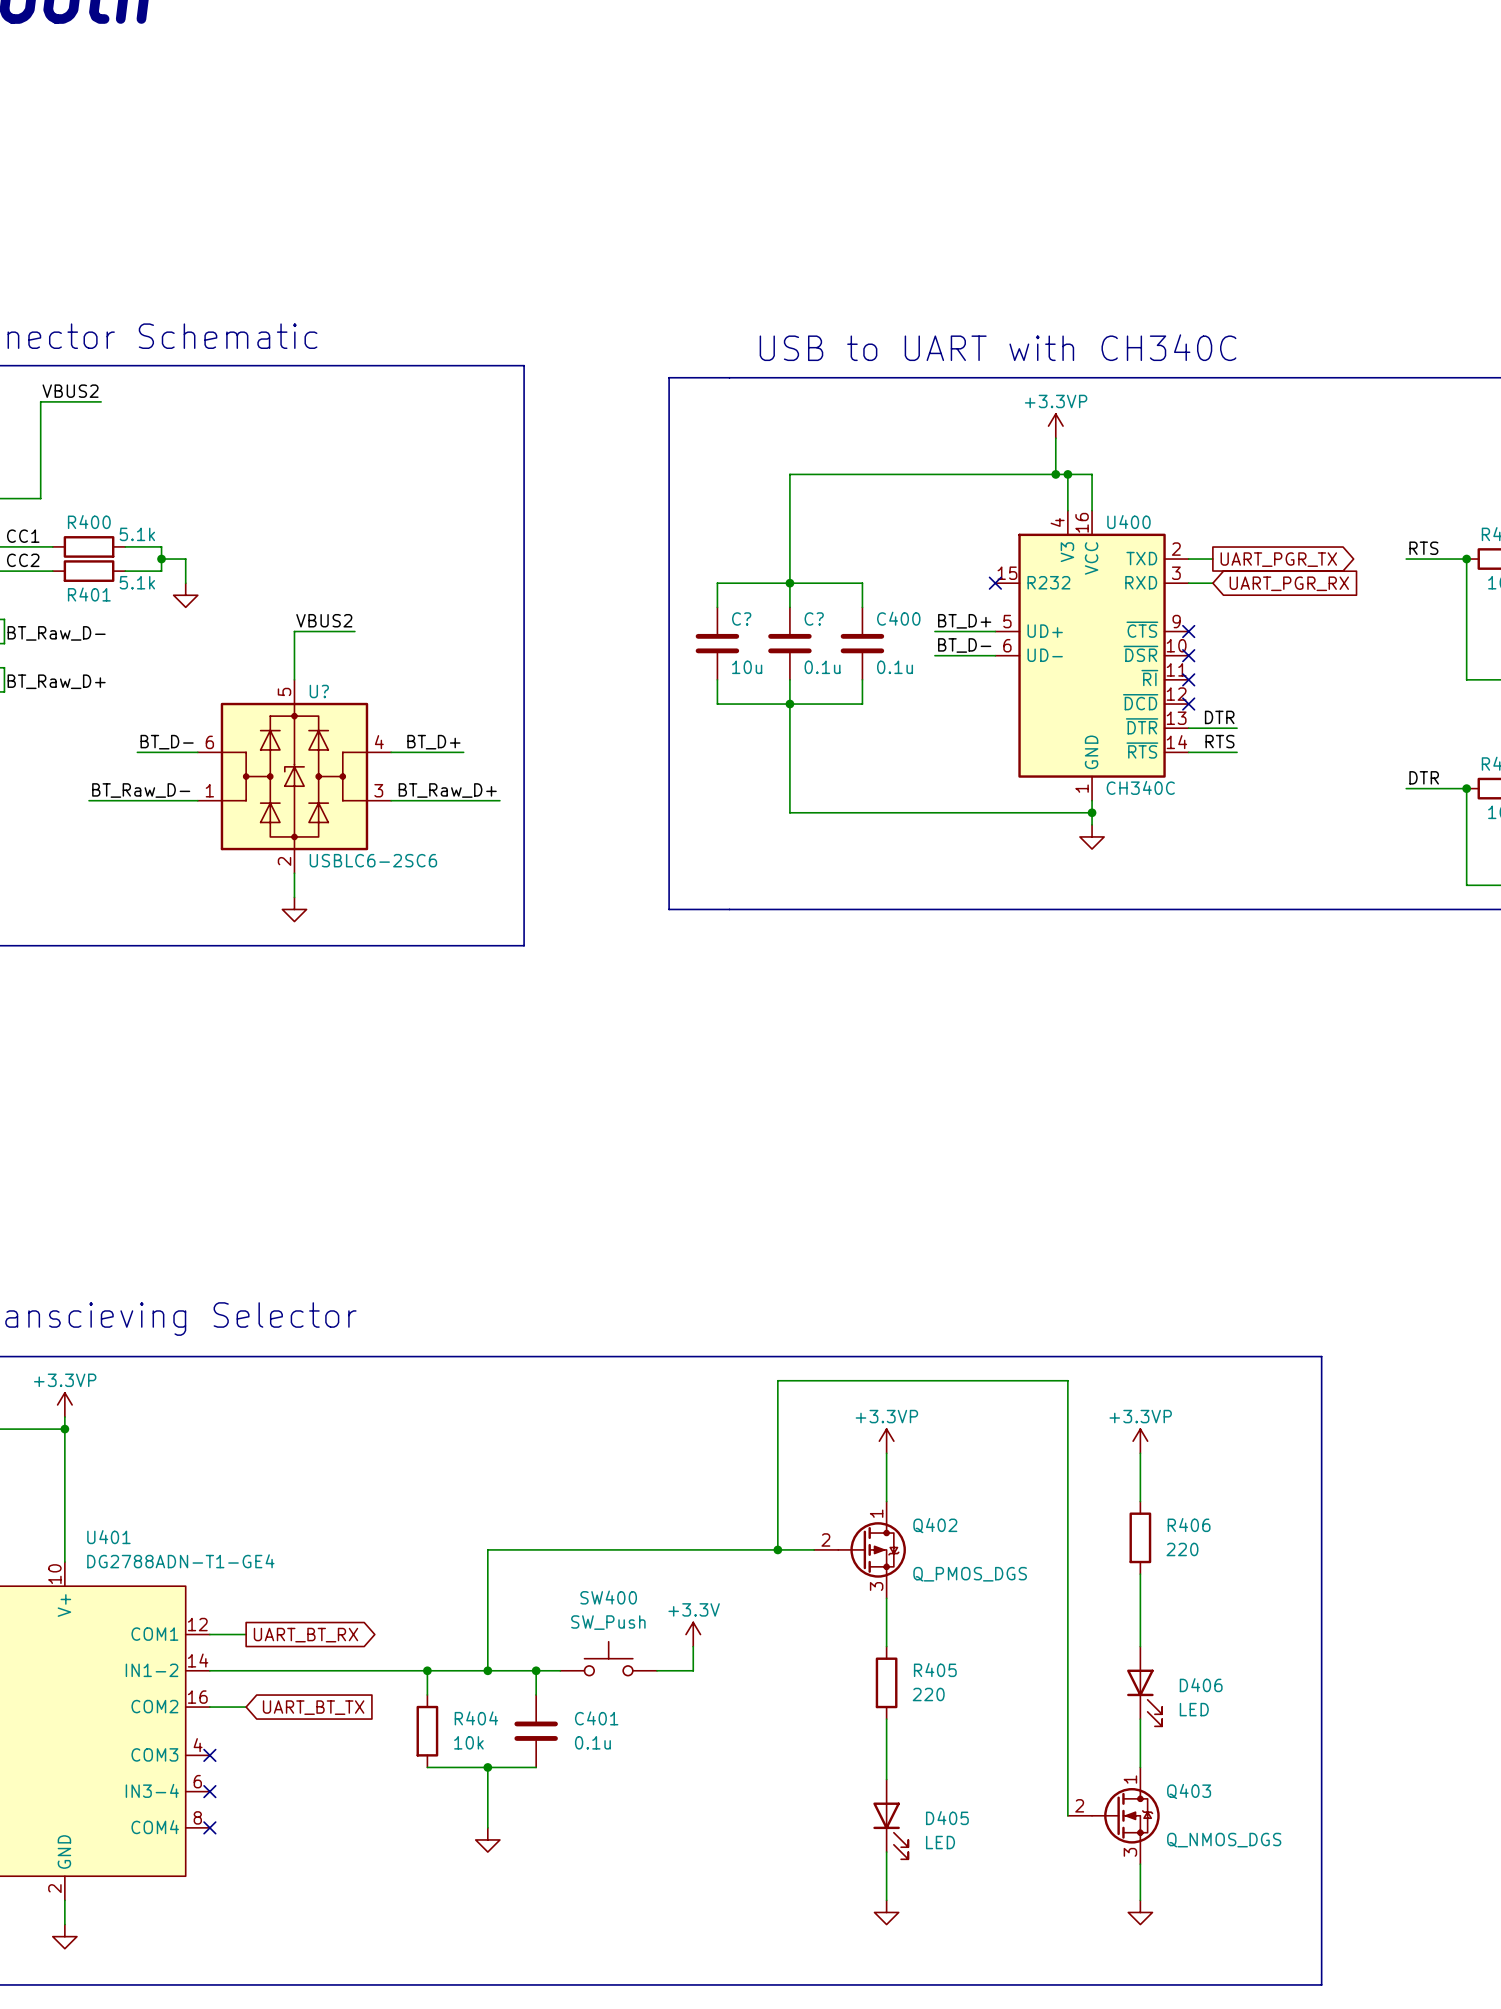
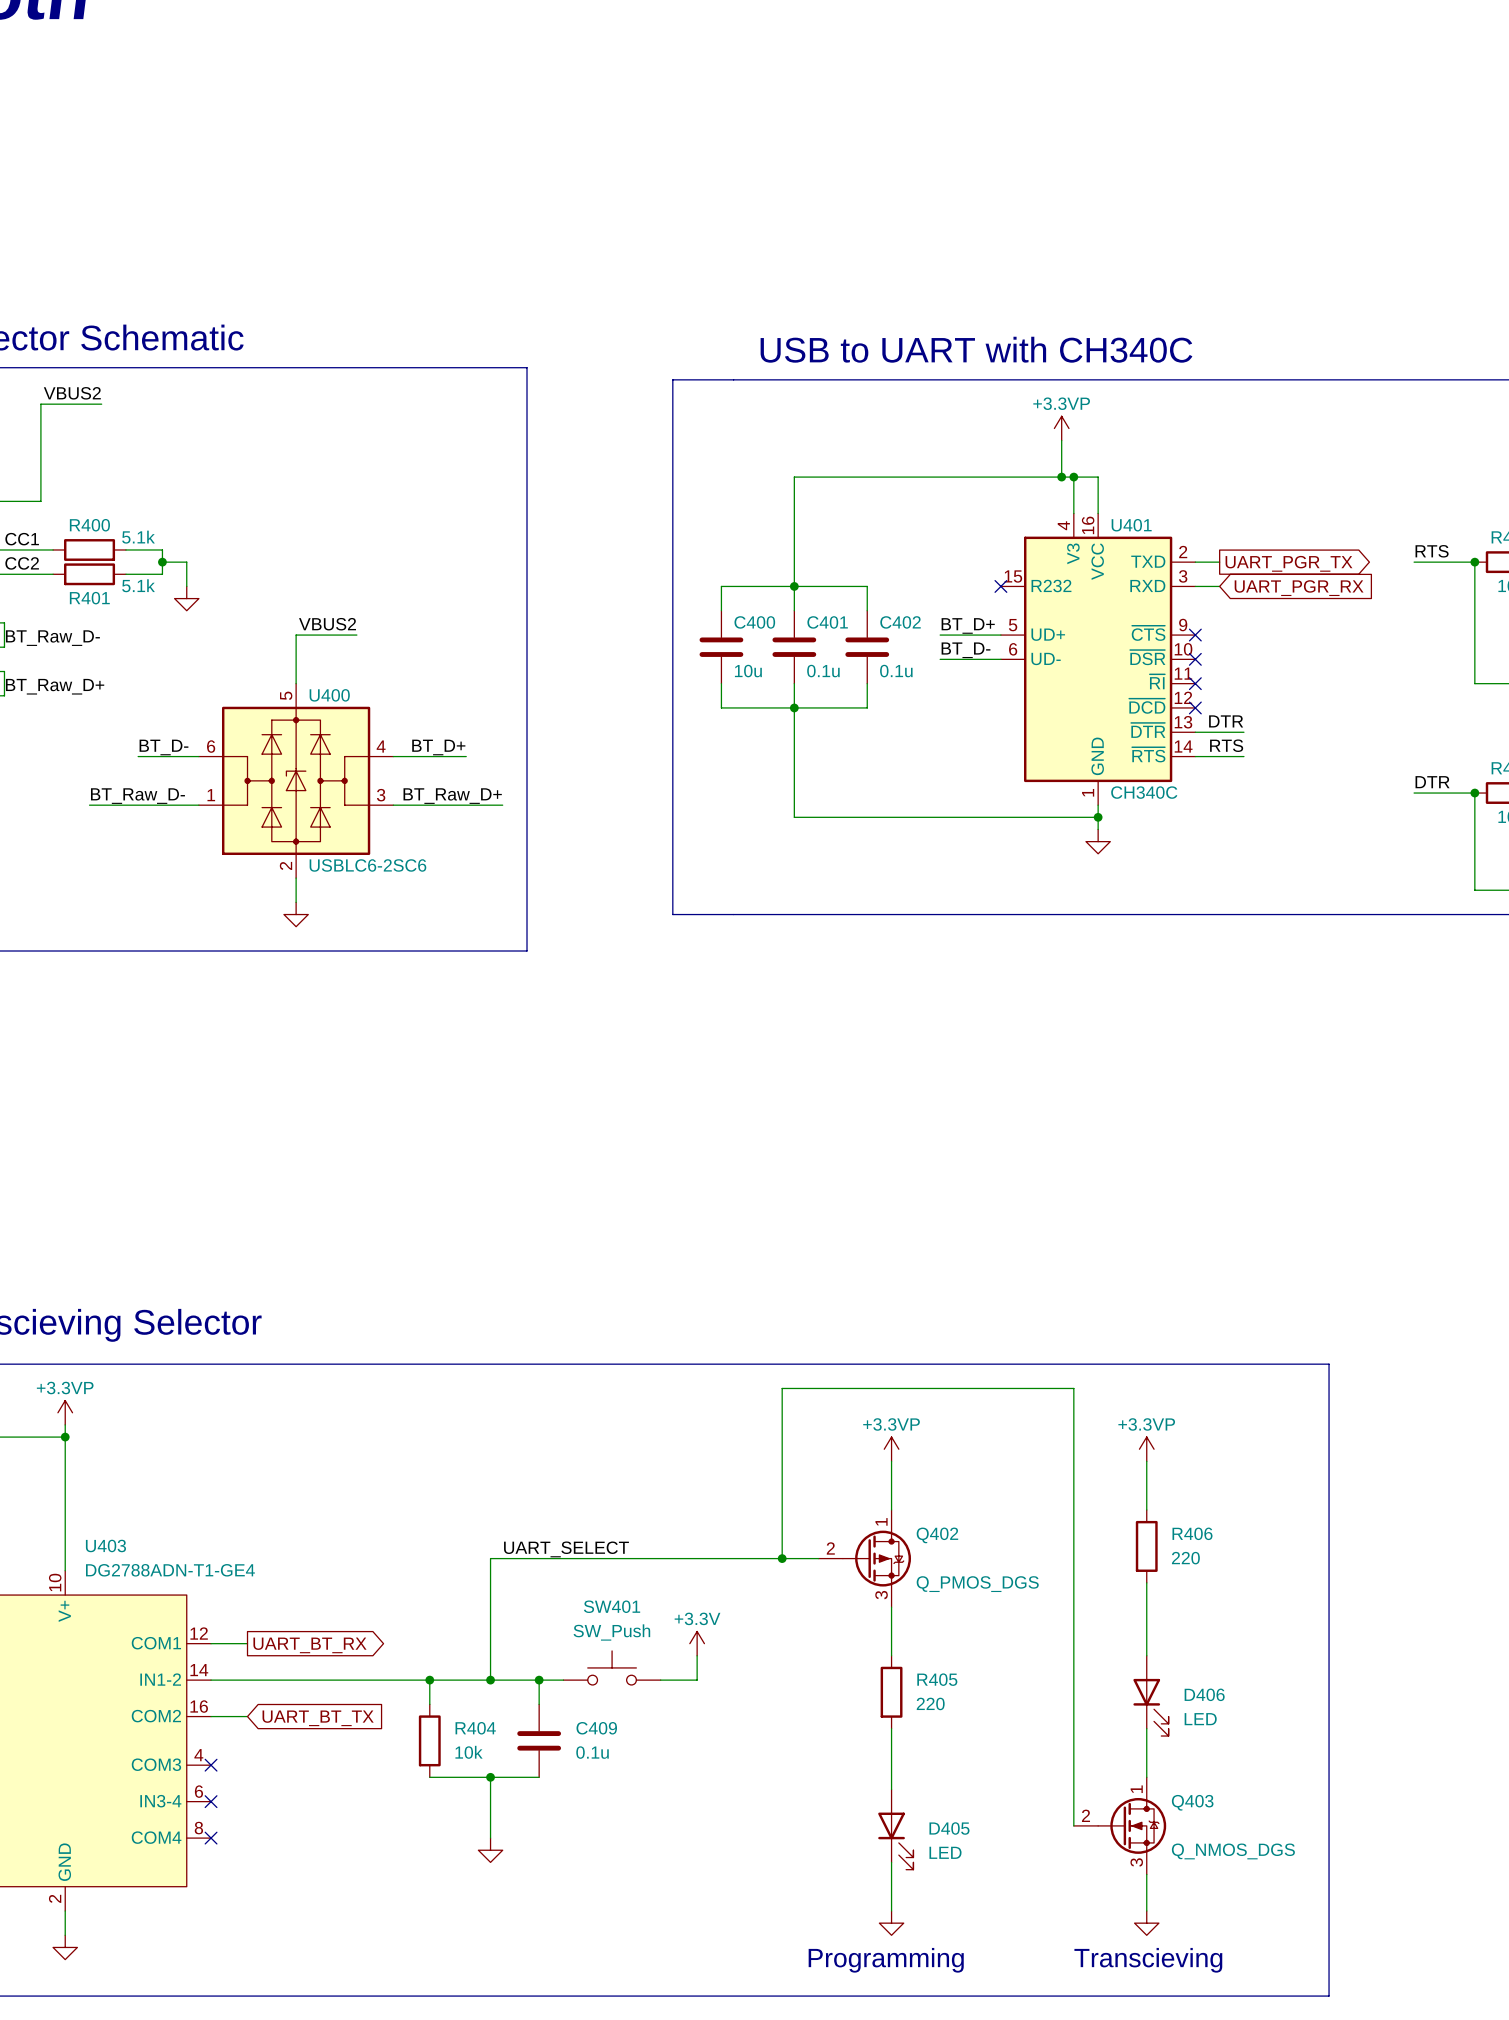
U400 name: U400 (1128, 522) -> U401 (1131, 525)
C? name: C? (741, 618) -> C400 (754, 622)
C? name: C? (814, 618) -> C401 (827, 622)
C400 name: C400 (898, 618) -> C402 (900, 622)
U? name: U? (319, 691) -> U400 (329, 695)
U401 name: U401 (108, 1537) -> U403 (105, 1545)
label: none -> UART_SELECT (566, 1549)
SW400 name: SW400 (608, 1597) -> SW401 (612, 1606)
C401 name: C401 (596, 1718) -> C409 (596, 1728)
text: none -> Programming (886, 1960)
text: none -> Transcieving (1148, 1960)

